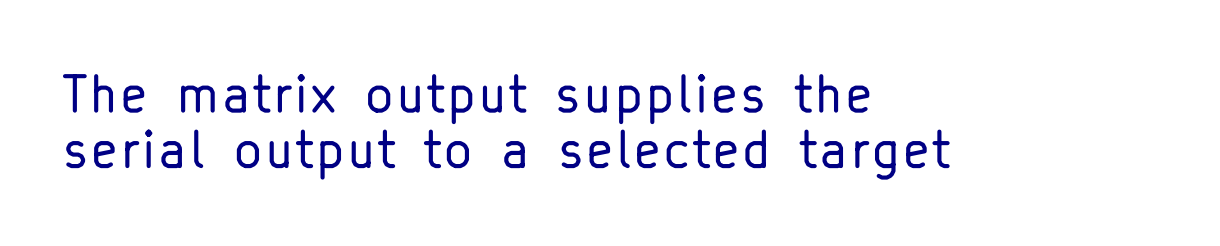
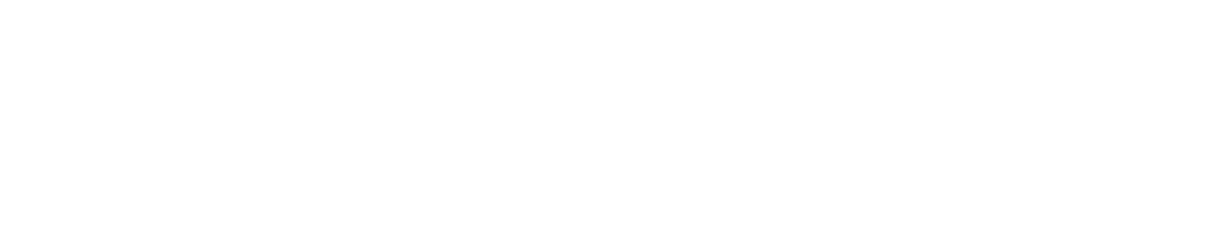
text: The matrix output supplies the (466, 99) -> none
text: serial output to a selected target (507, 154) -> none

